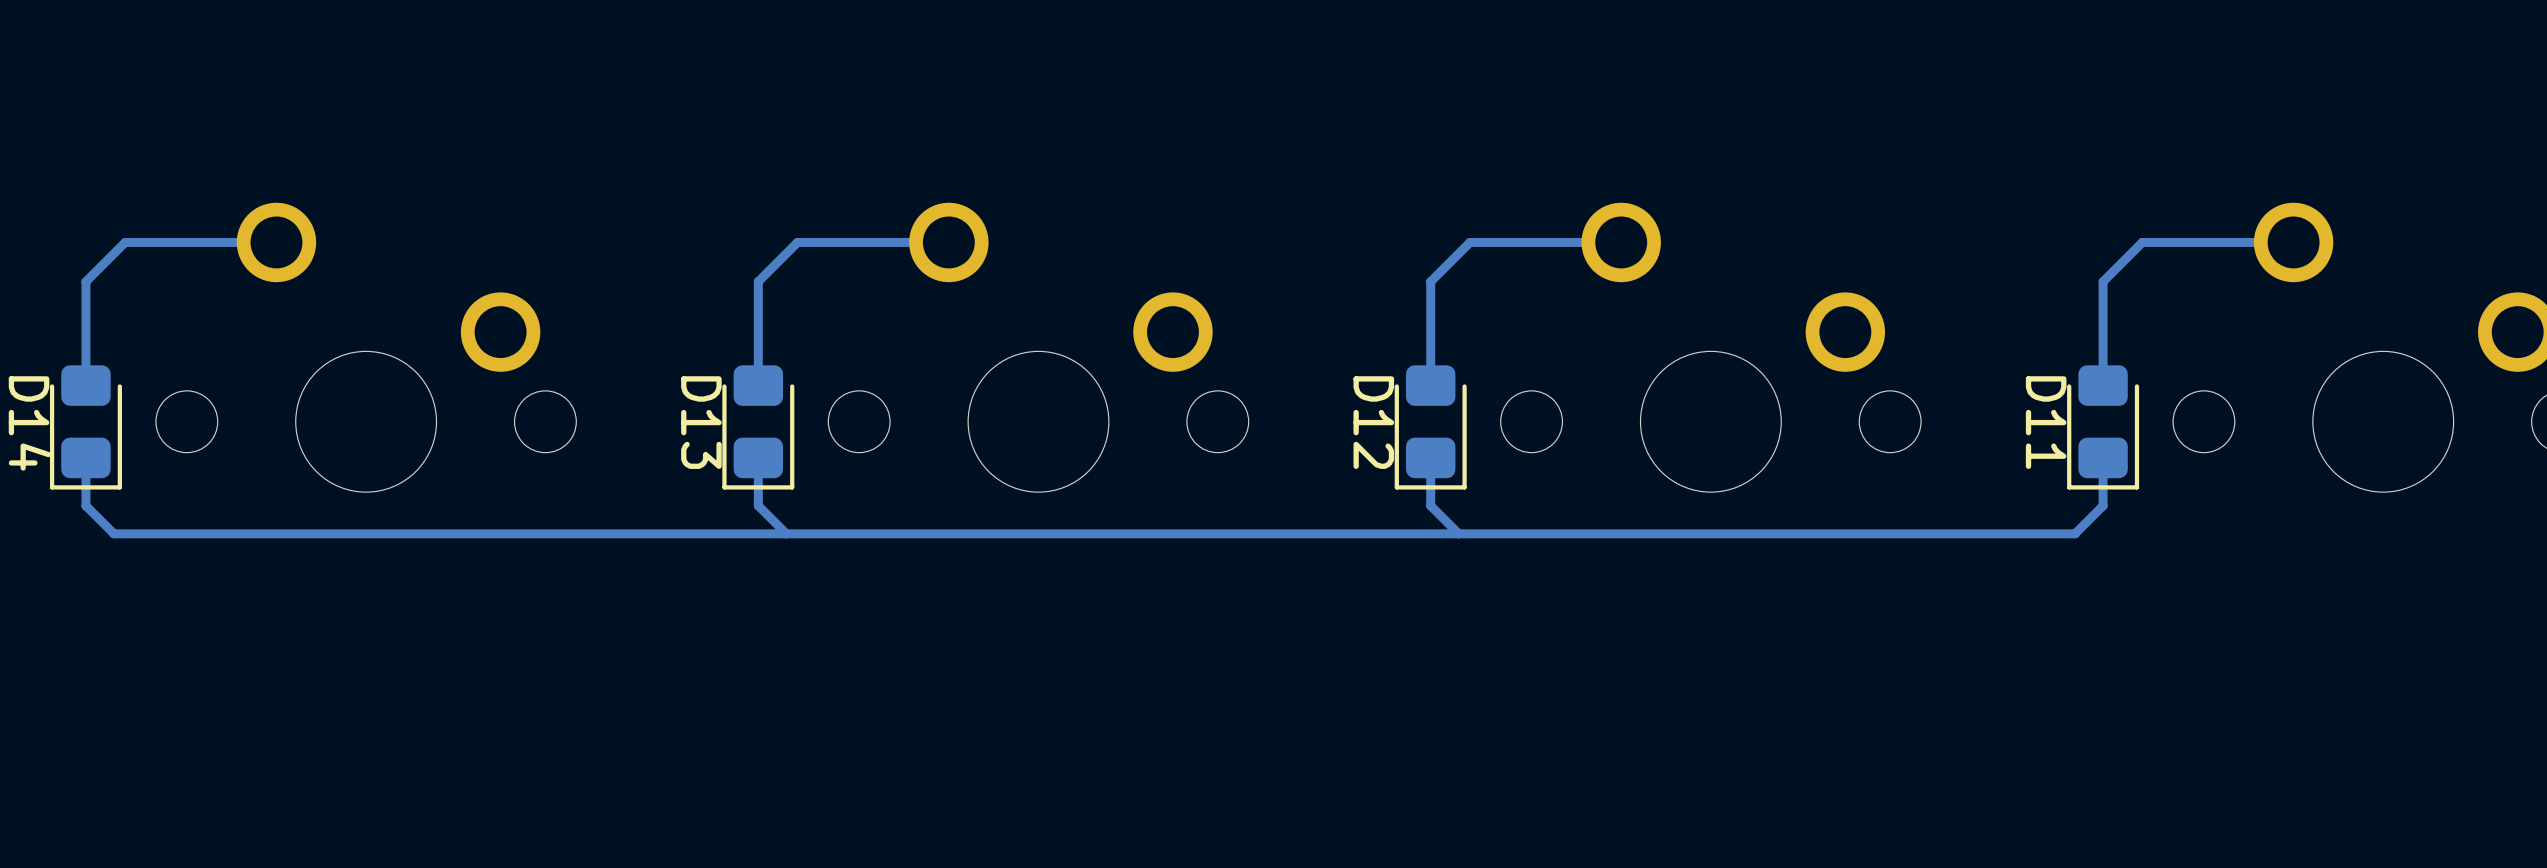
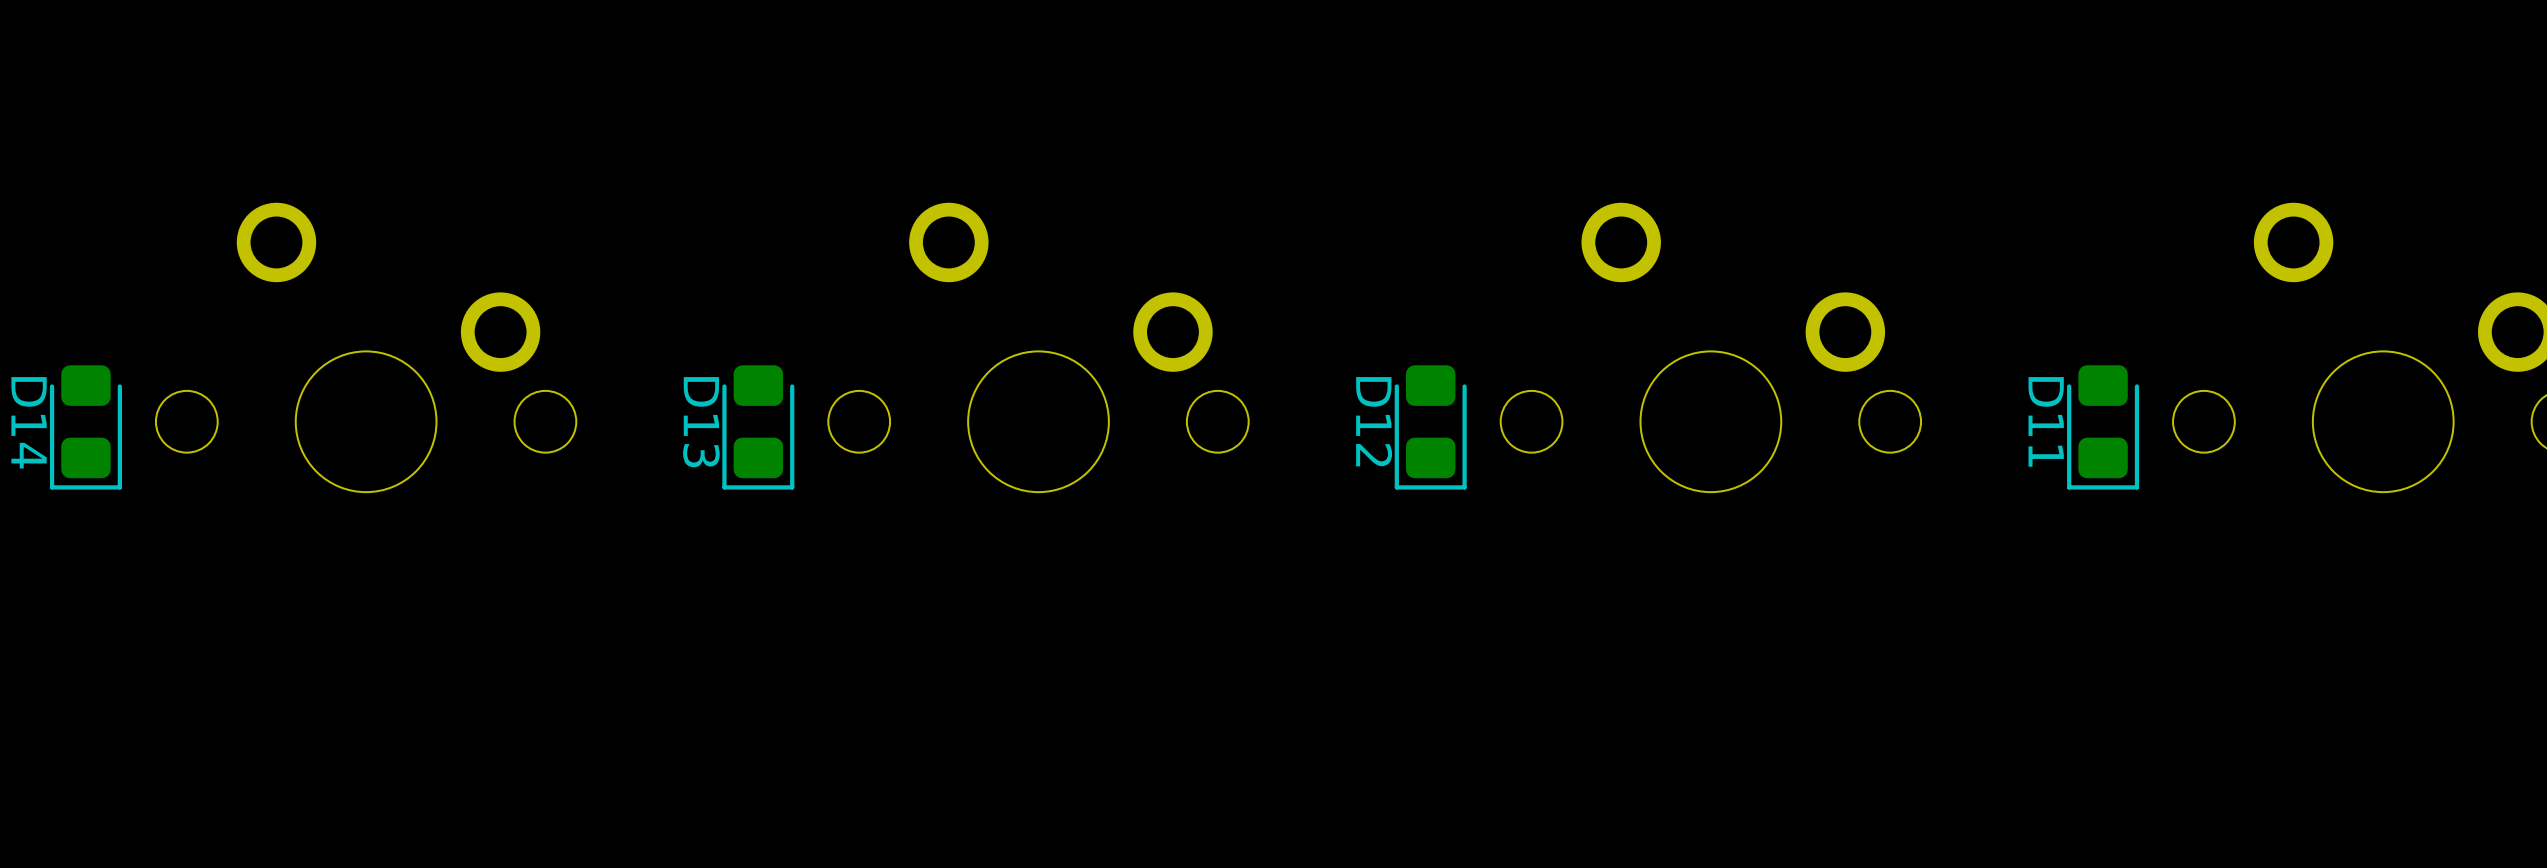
bottom track: (276, 242) (125, 242) (85, 281) (85, 385) -> none
bottom track: (948, 242) (797, 242) (758, 281) (758, 385) -> none
bottom track: (1621, 242) (1469, 242) (1430, 281) (1430, 385) -> none
bottom track: (2293, 242) (2142, 242) (2103, 281) (2103, 385) -> none
bottom track: (758, 457) (758, 505) (786, 533) -> none
bottom track: (1430, 457) (1430, 505) (1458, 533) -> none
bottom track: (2103, 457) (2103, 505) (2075, 533) (113, 533) (85, 505) (85, 457) -> none

